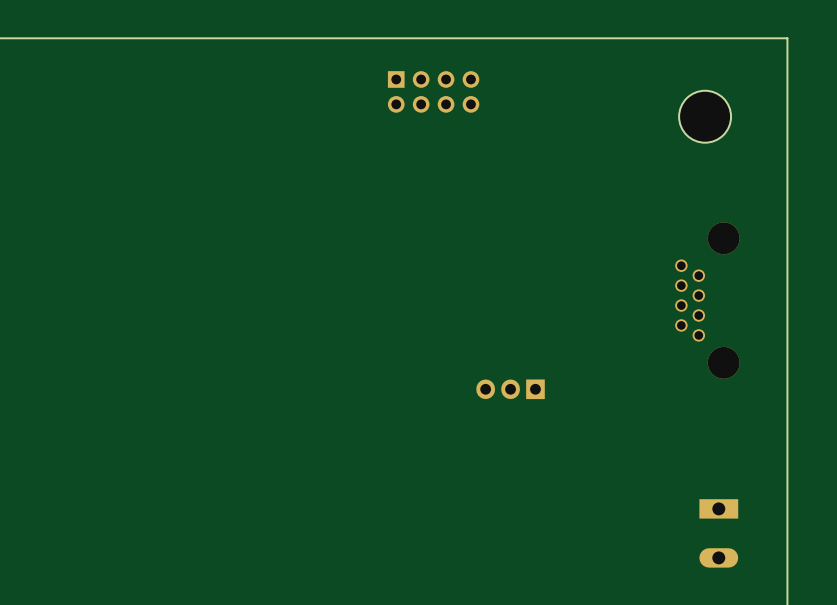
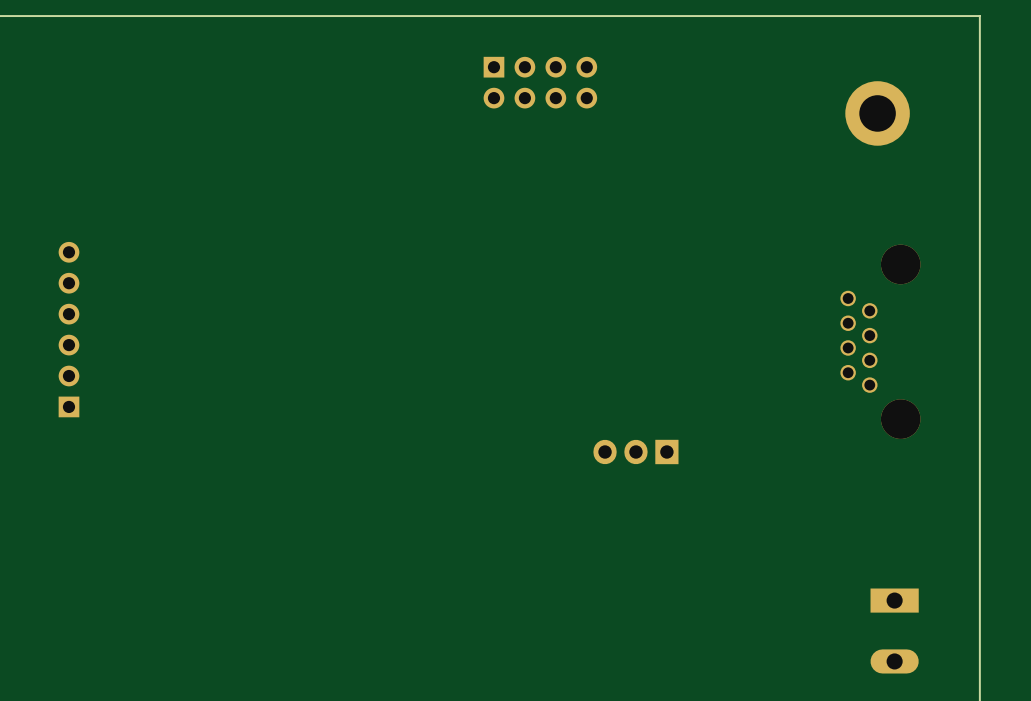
part footprint: [679, 90, 732, 143] -> [845, 81, 910, 146]
part: none -> (68, 329)

